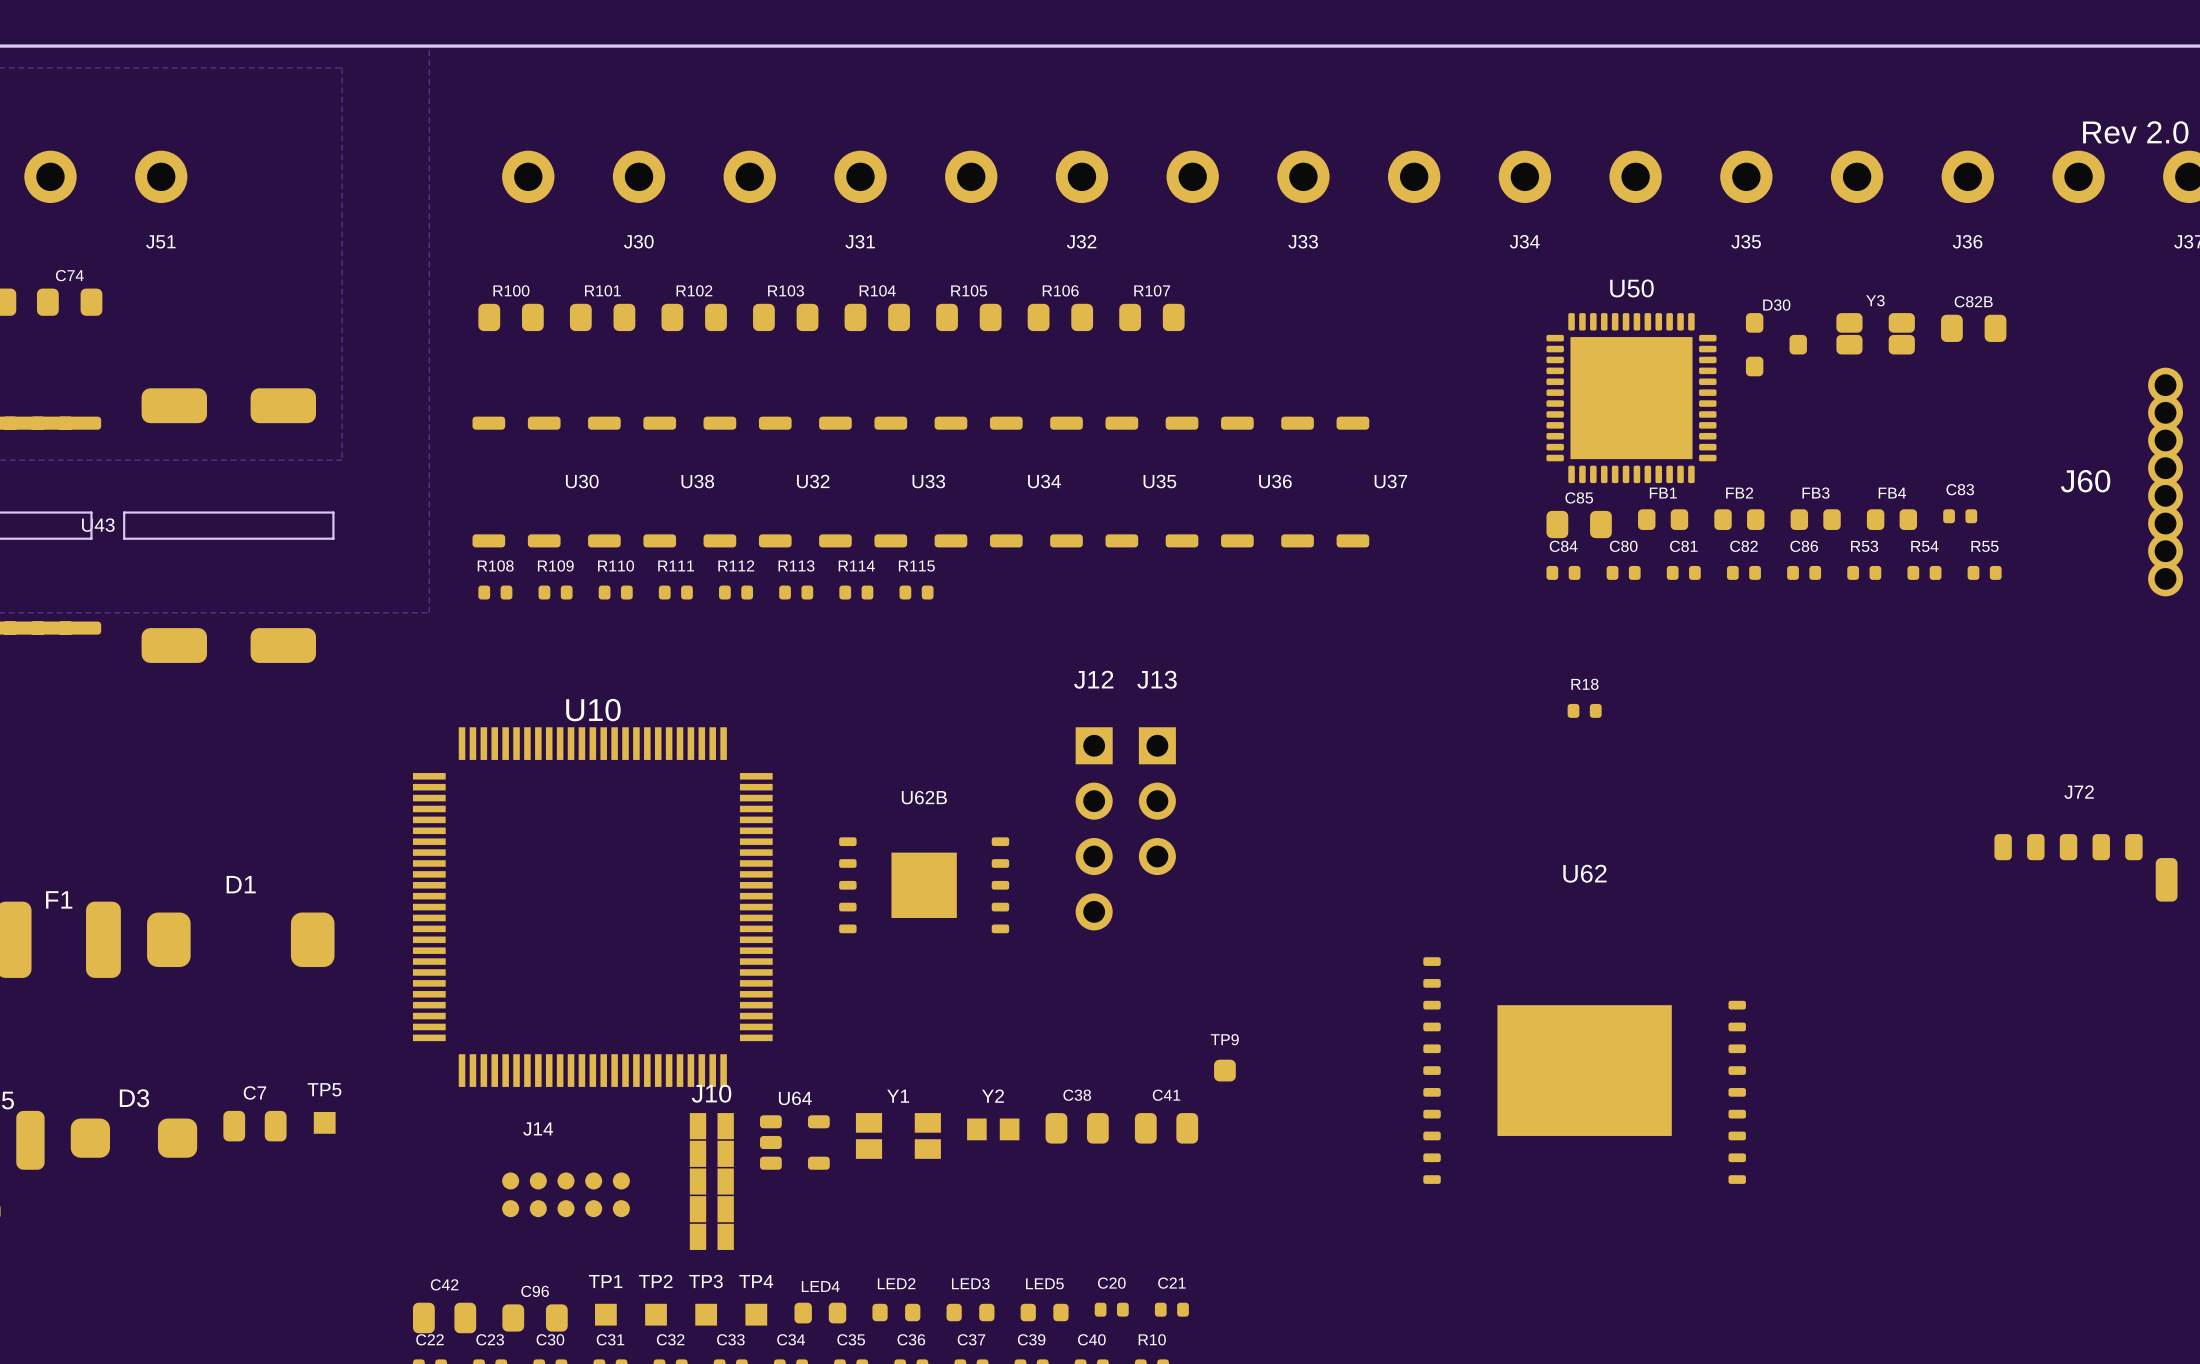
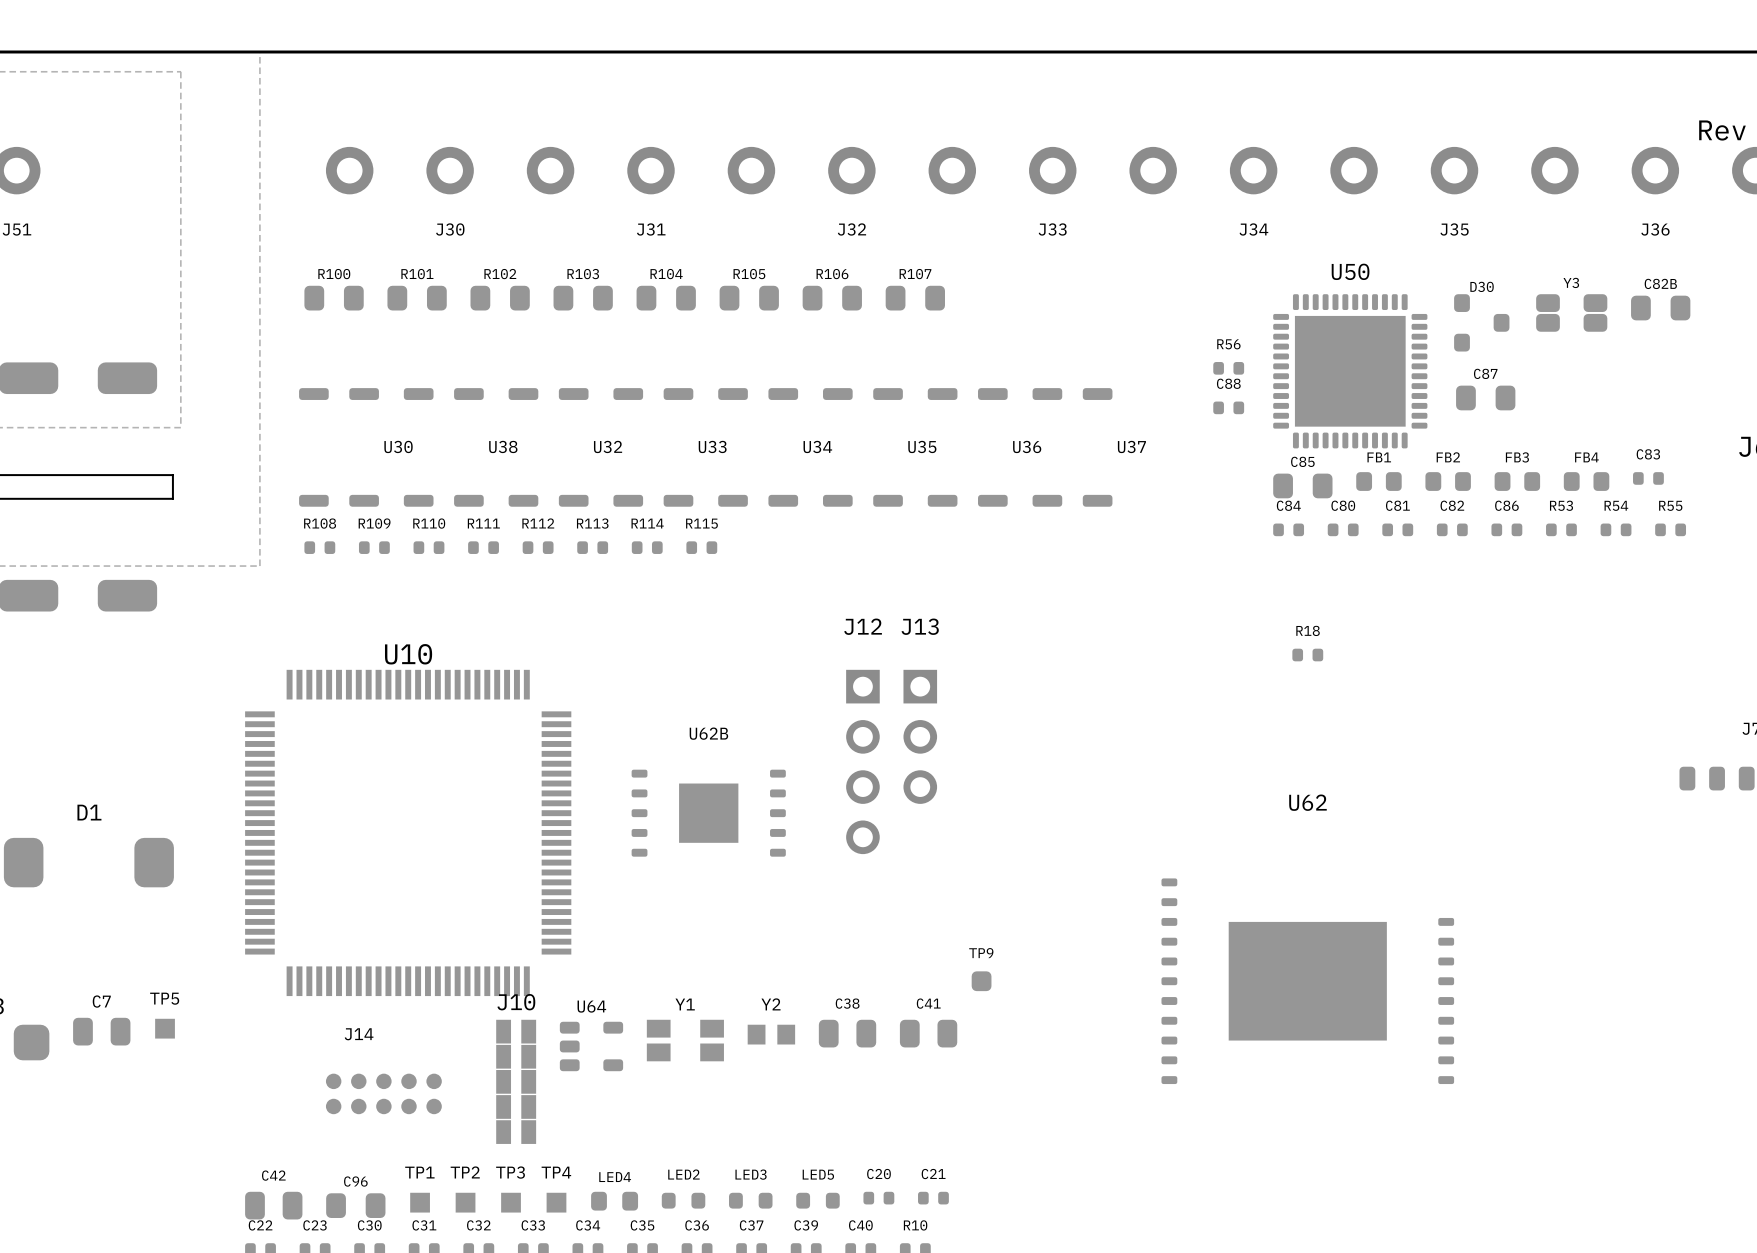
R56: none -> (1228, 368)
C87: none -> (1485, 397)
C88: none -> (1228, 407)

